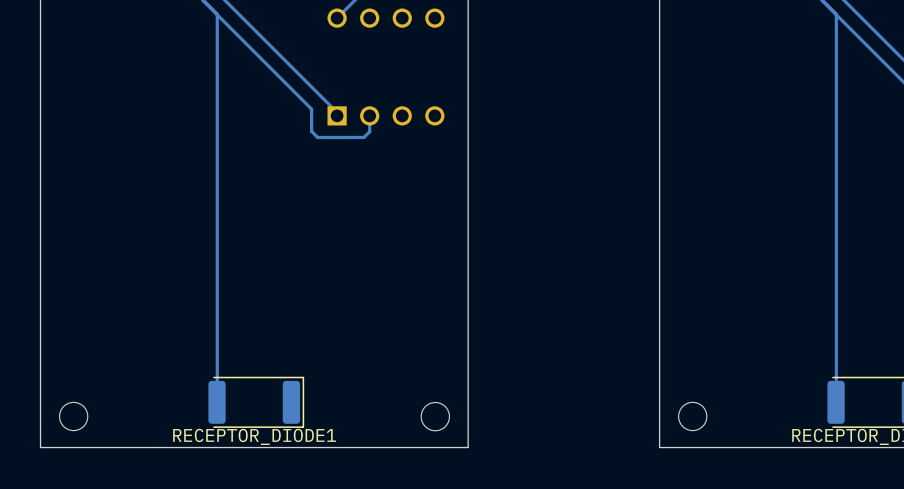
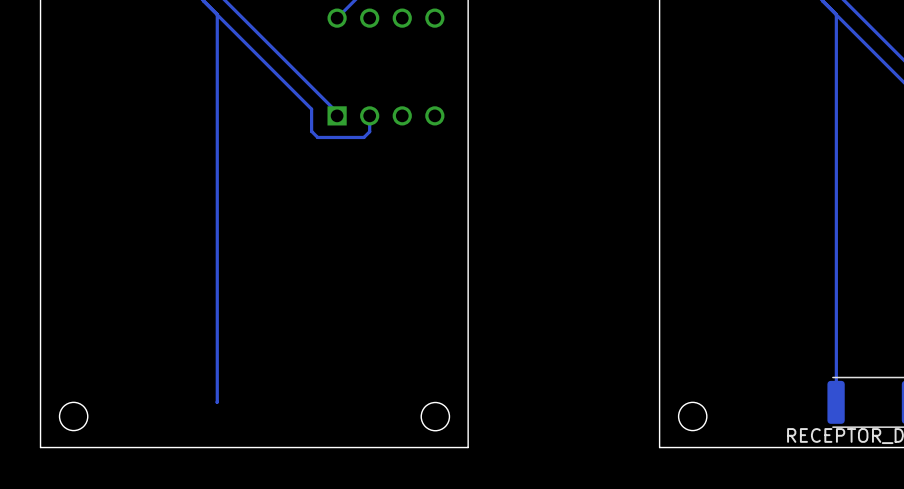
RECEPTOR_DIODE1: (256, 402) -> none

